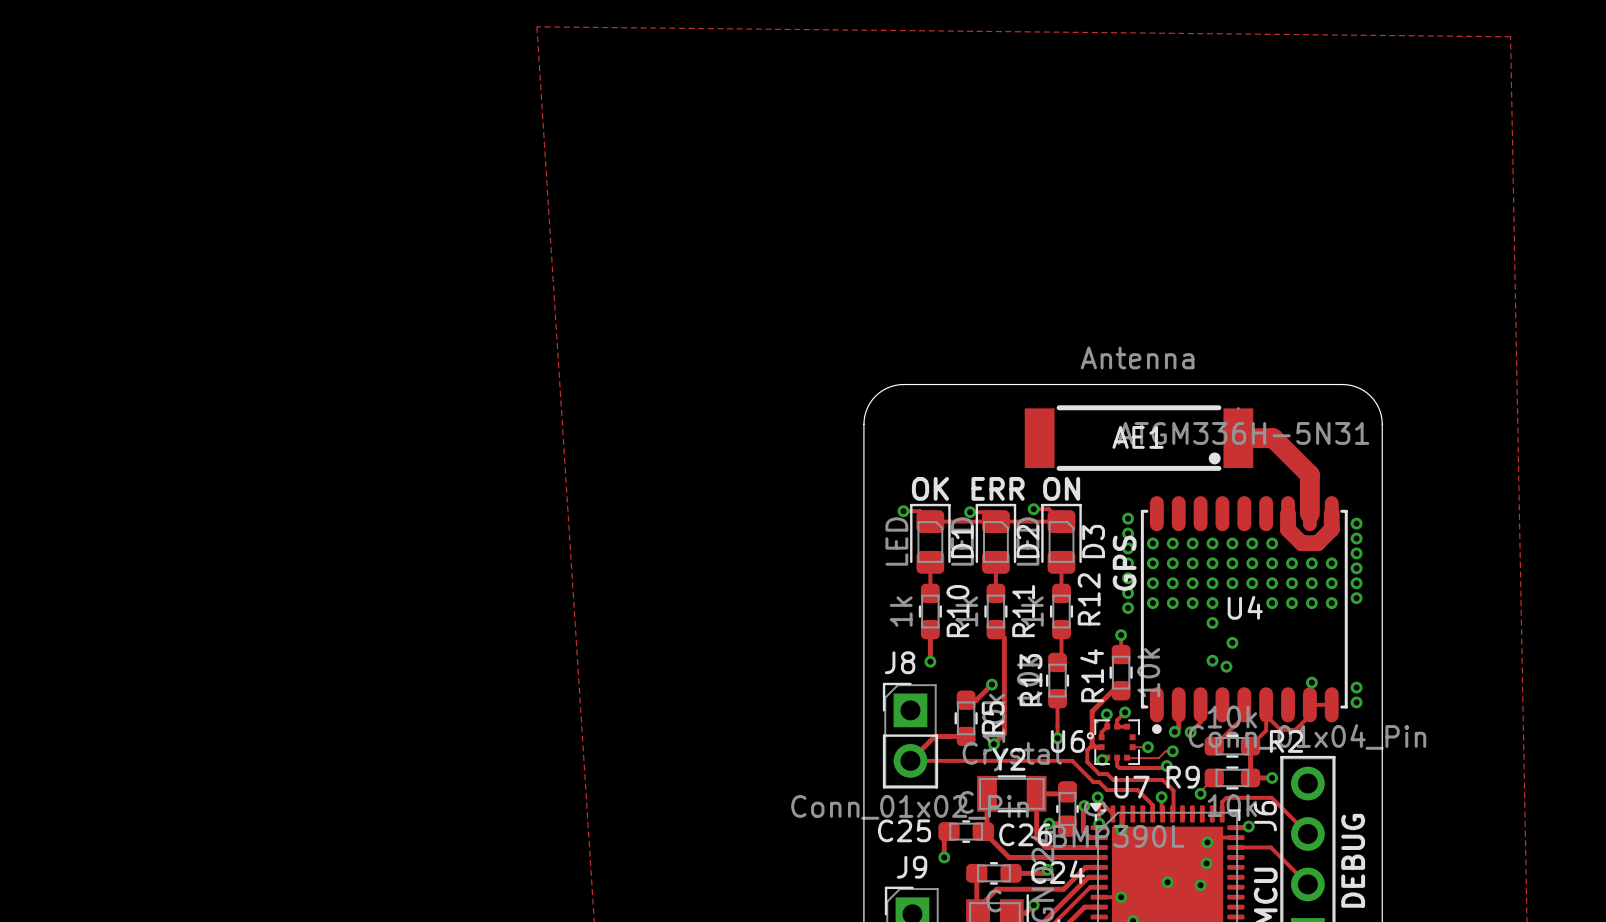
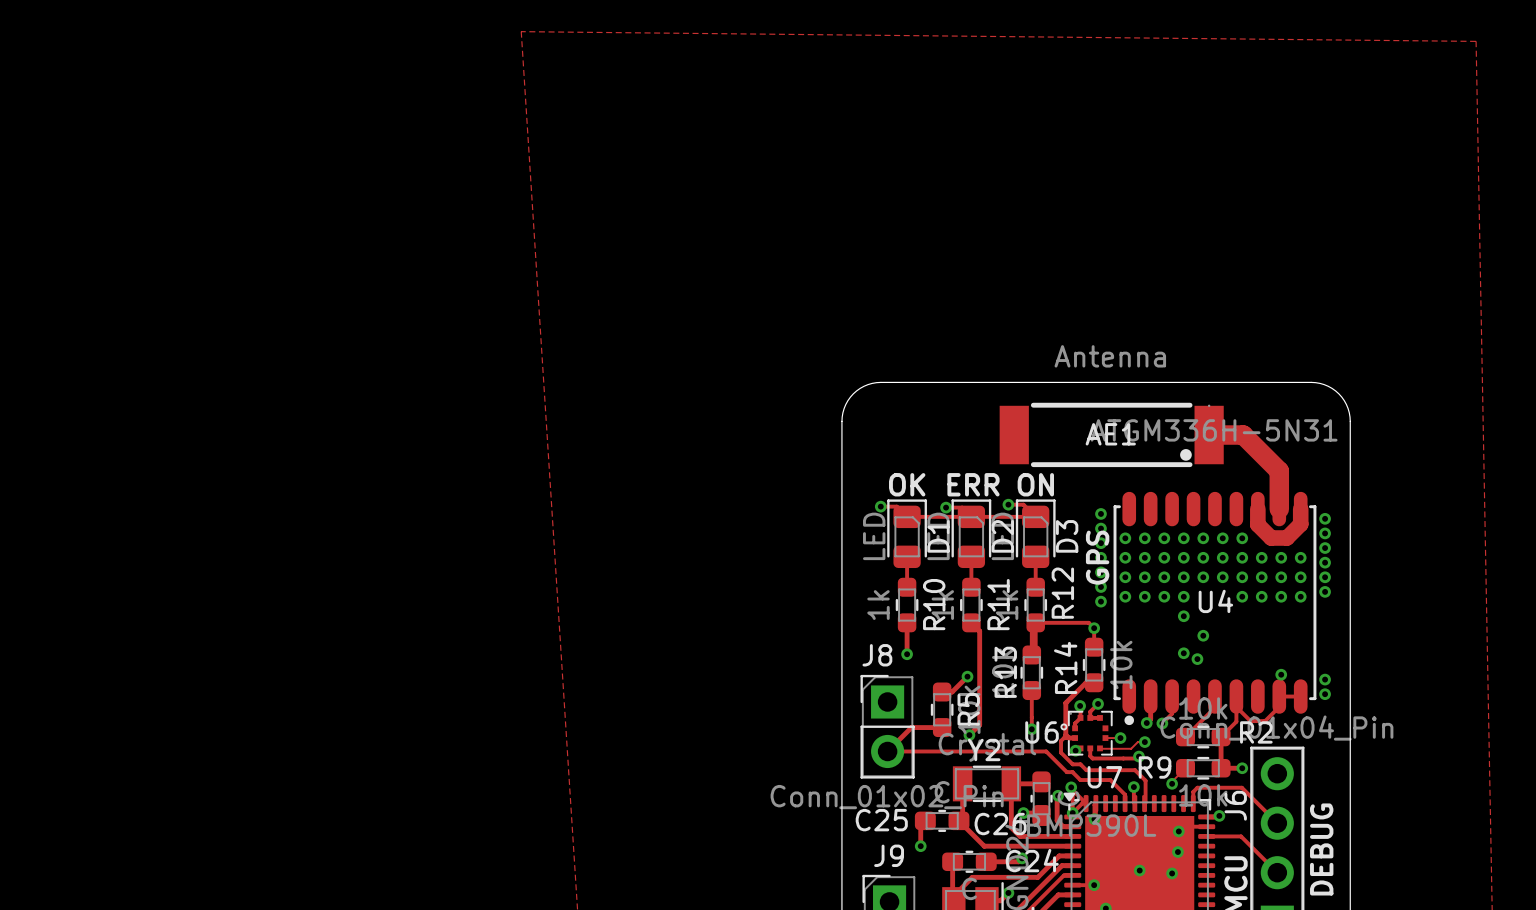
track: none -> (1094, 628) (1088, 622) (1035, 622) (1031, 626) (1031, 654)
track: none -> (1086, 803) (1082, 803) (1072, 813)

